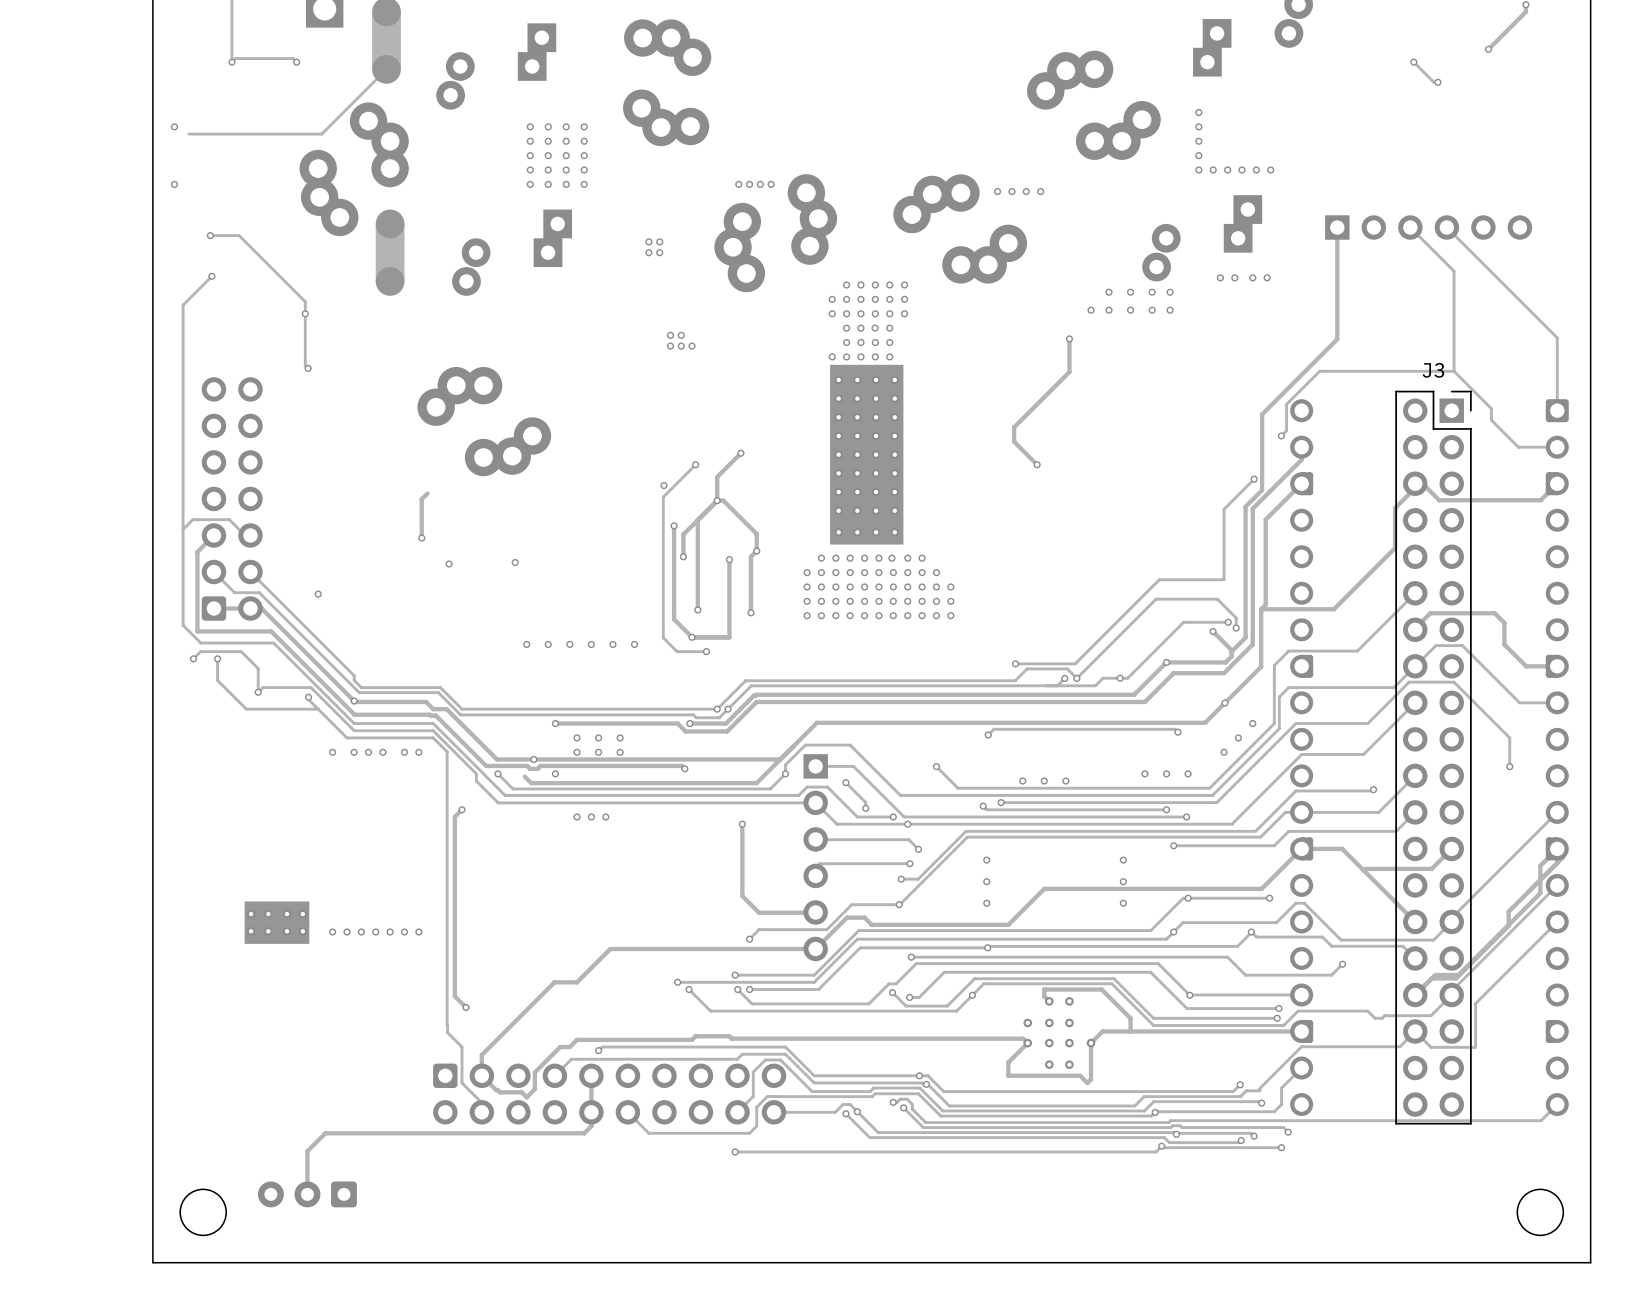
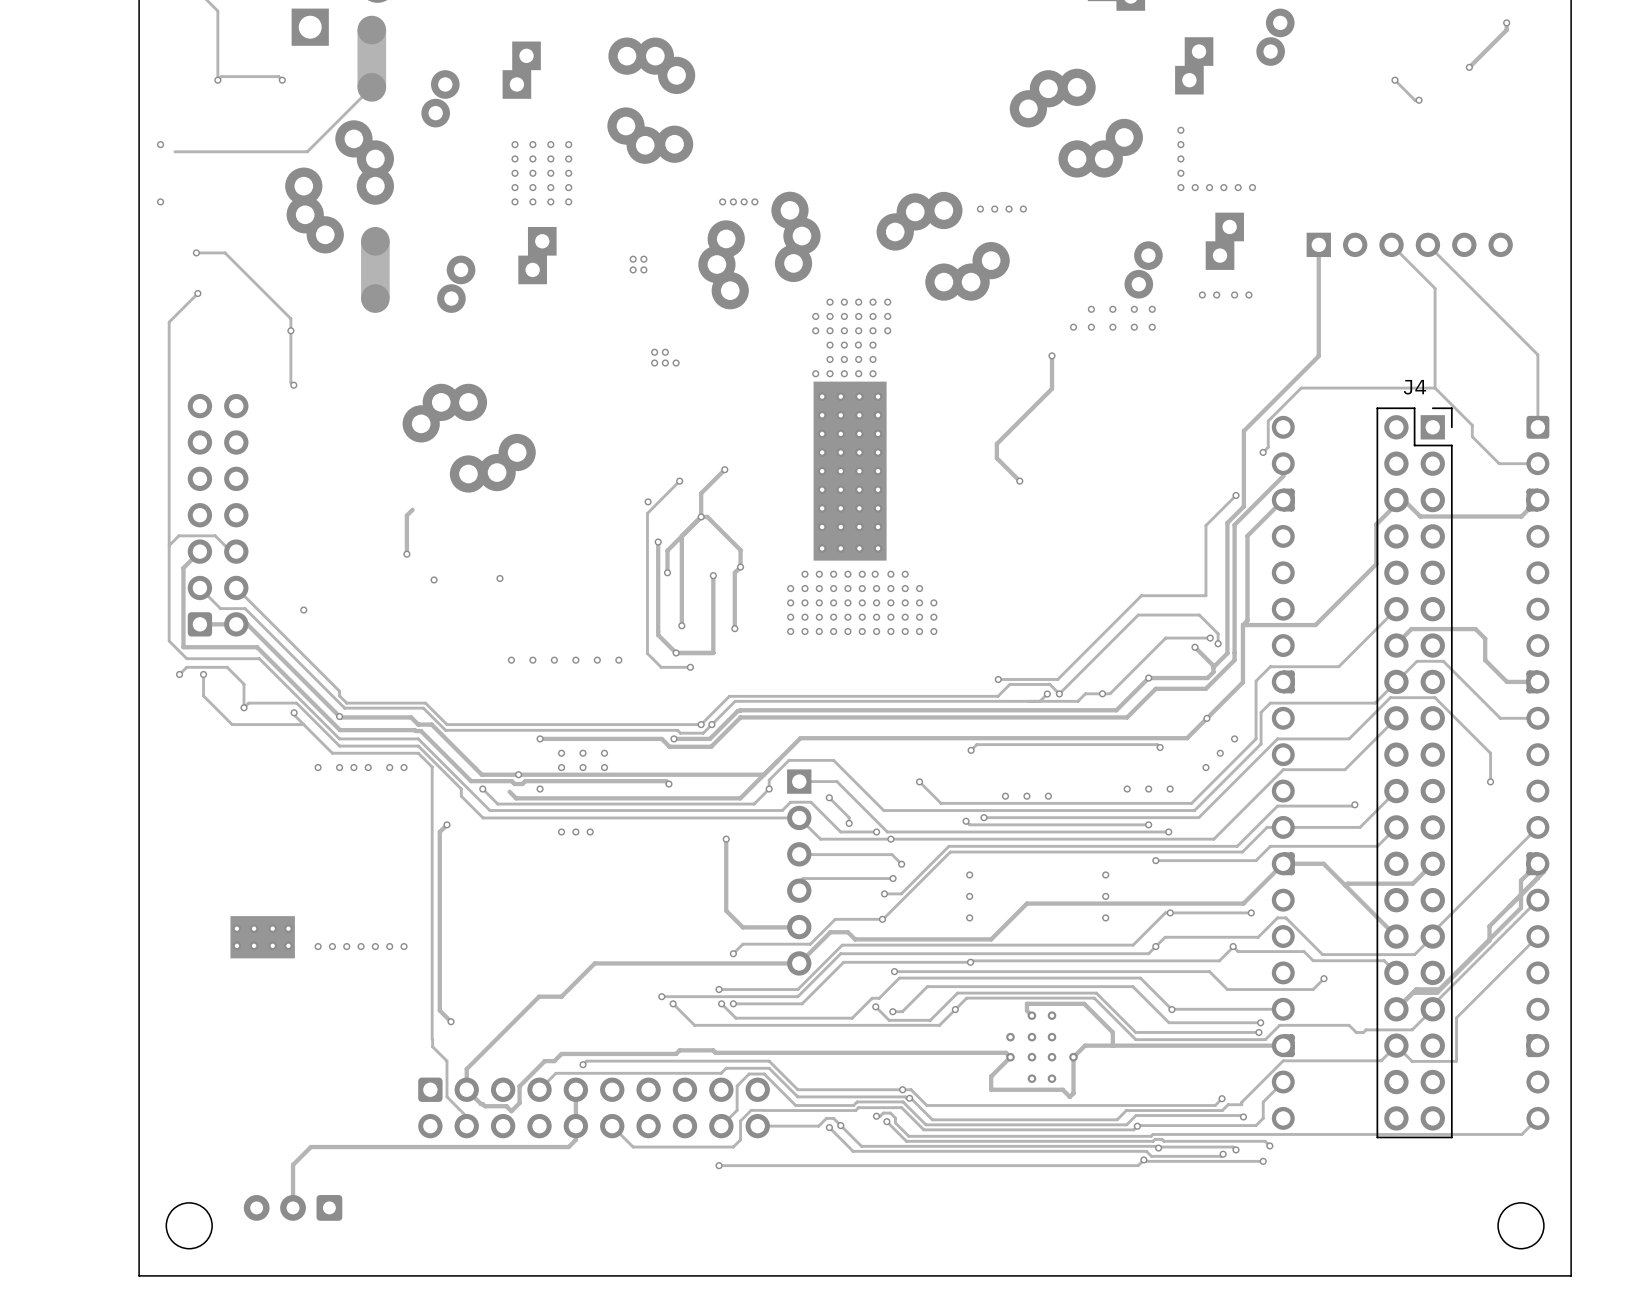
J3 name: J3 (1433, 370) -> J4 (1414, 387)

